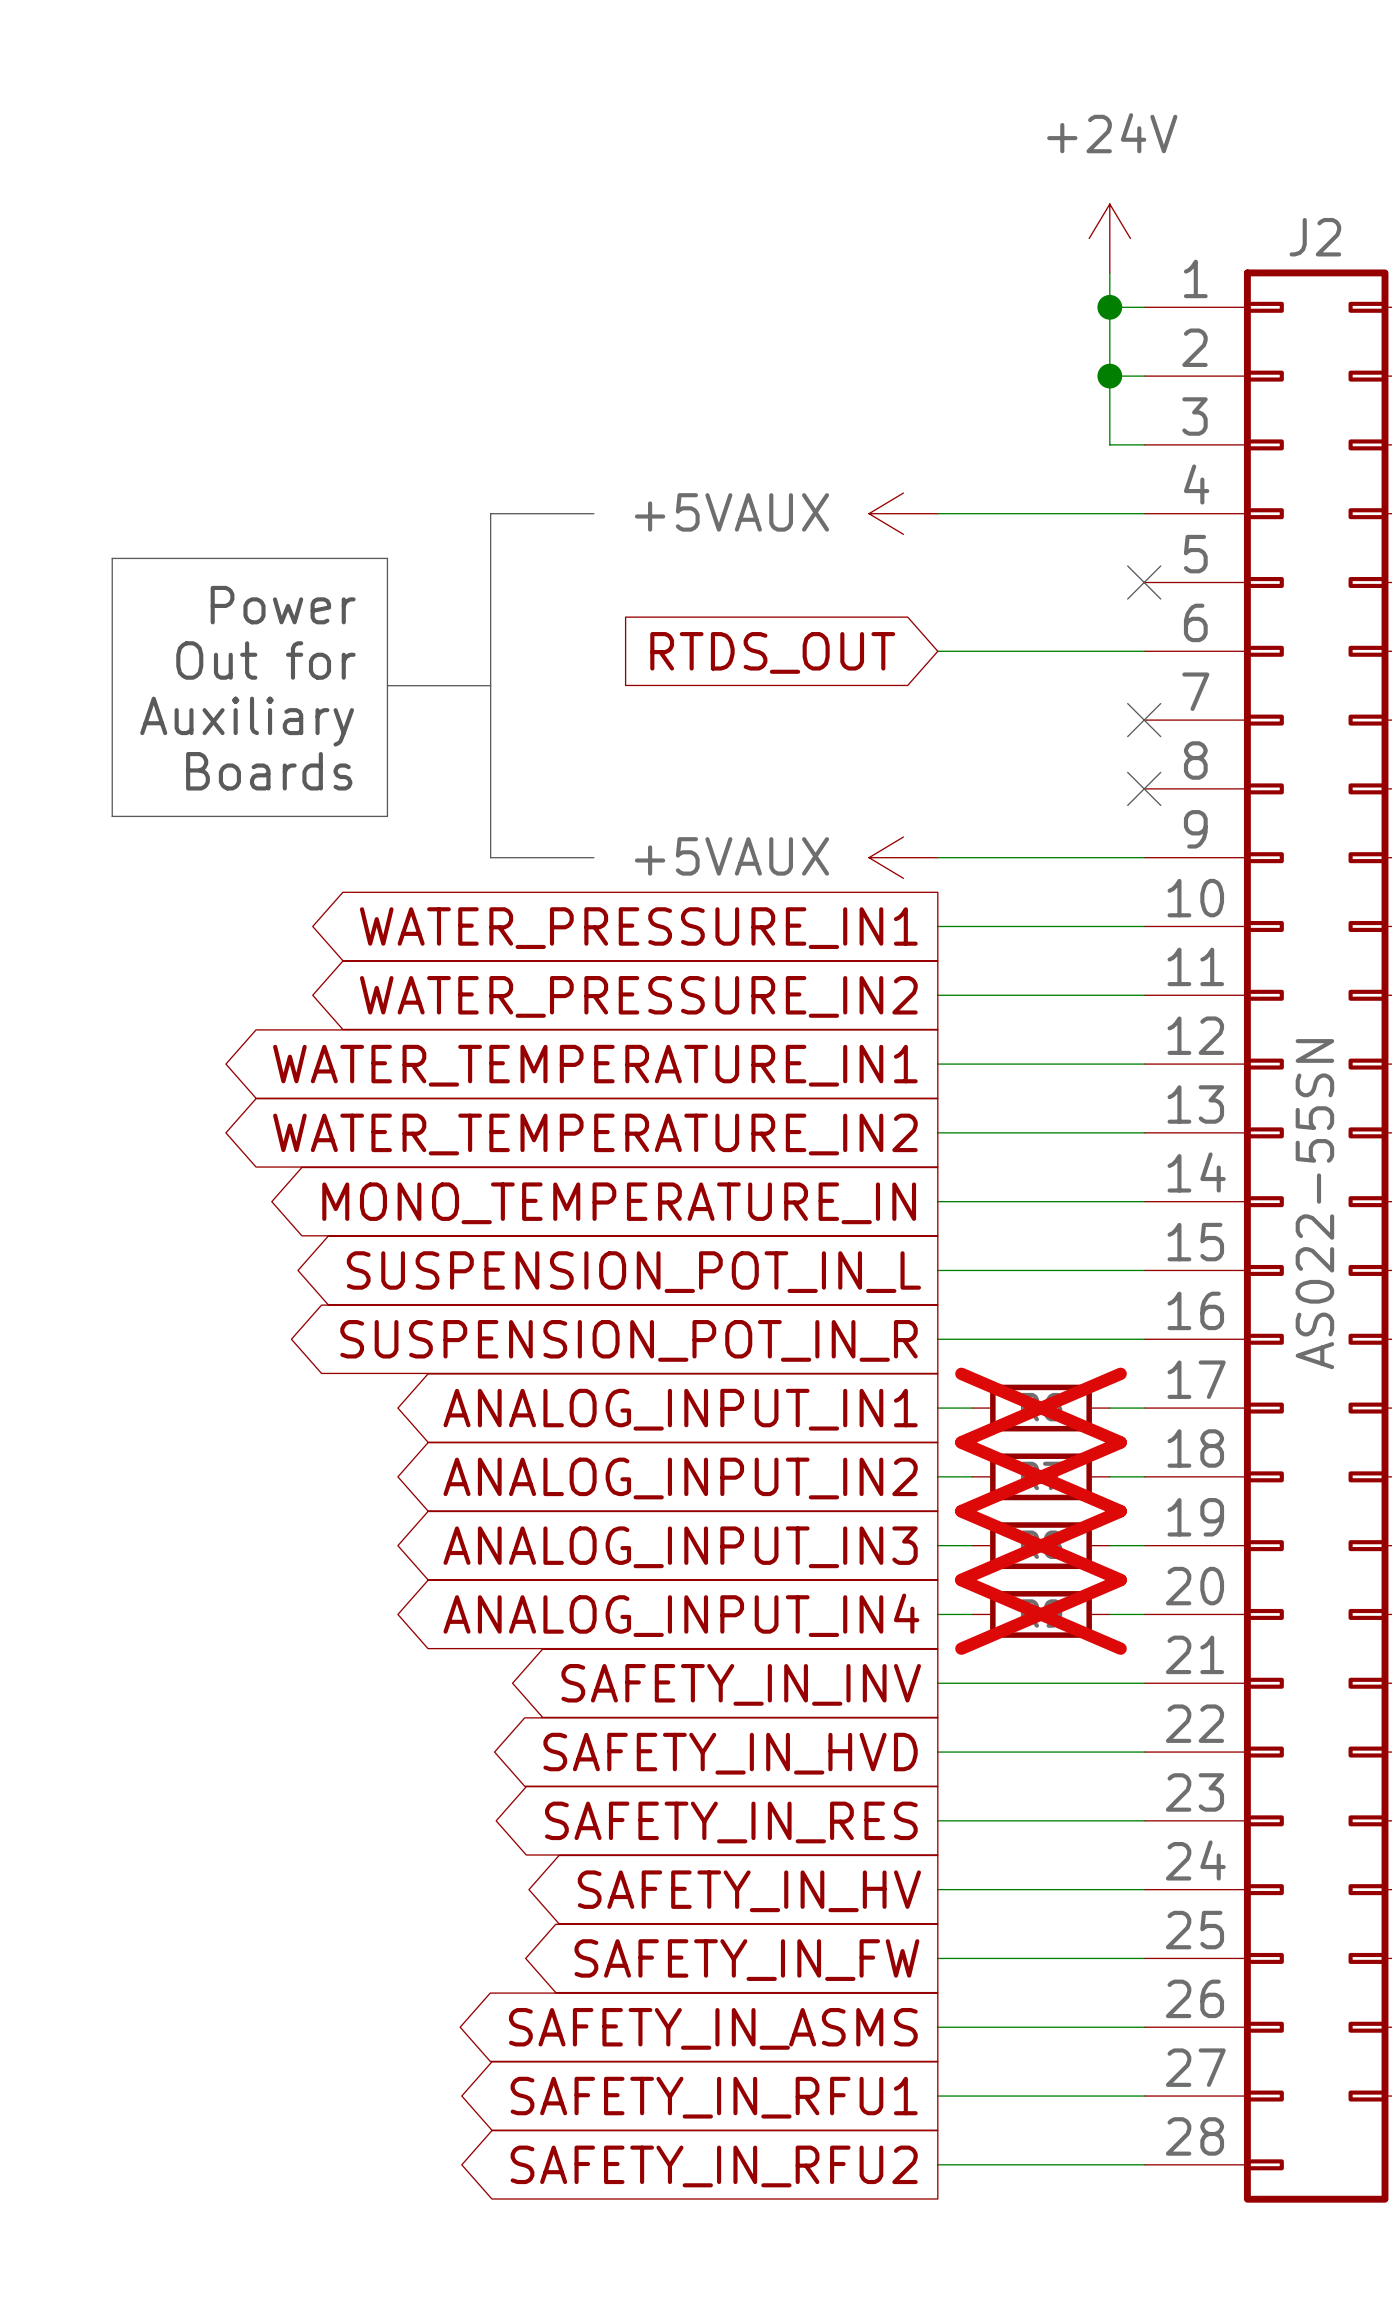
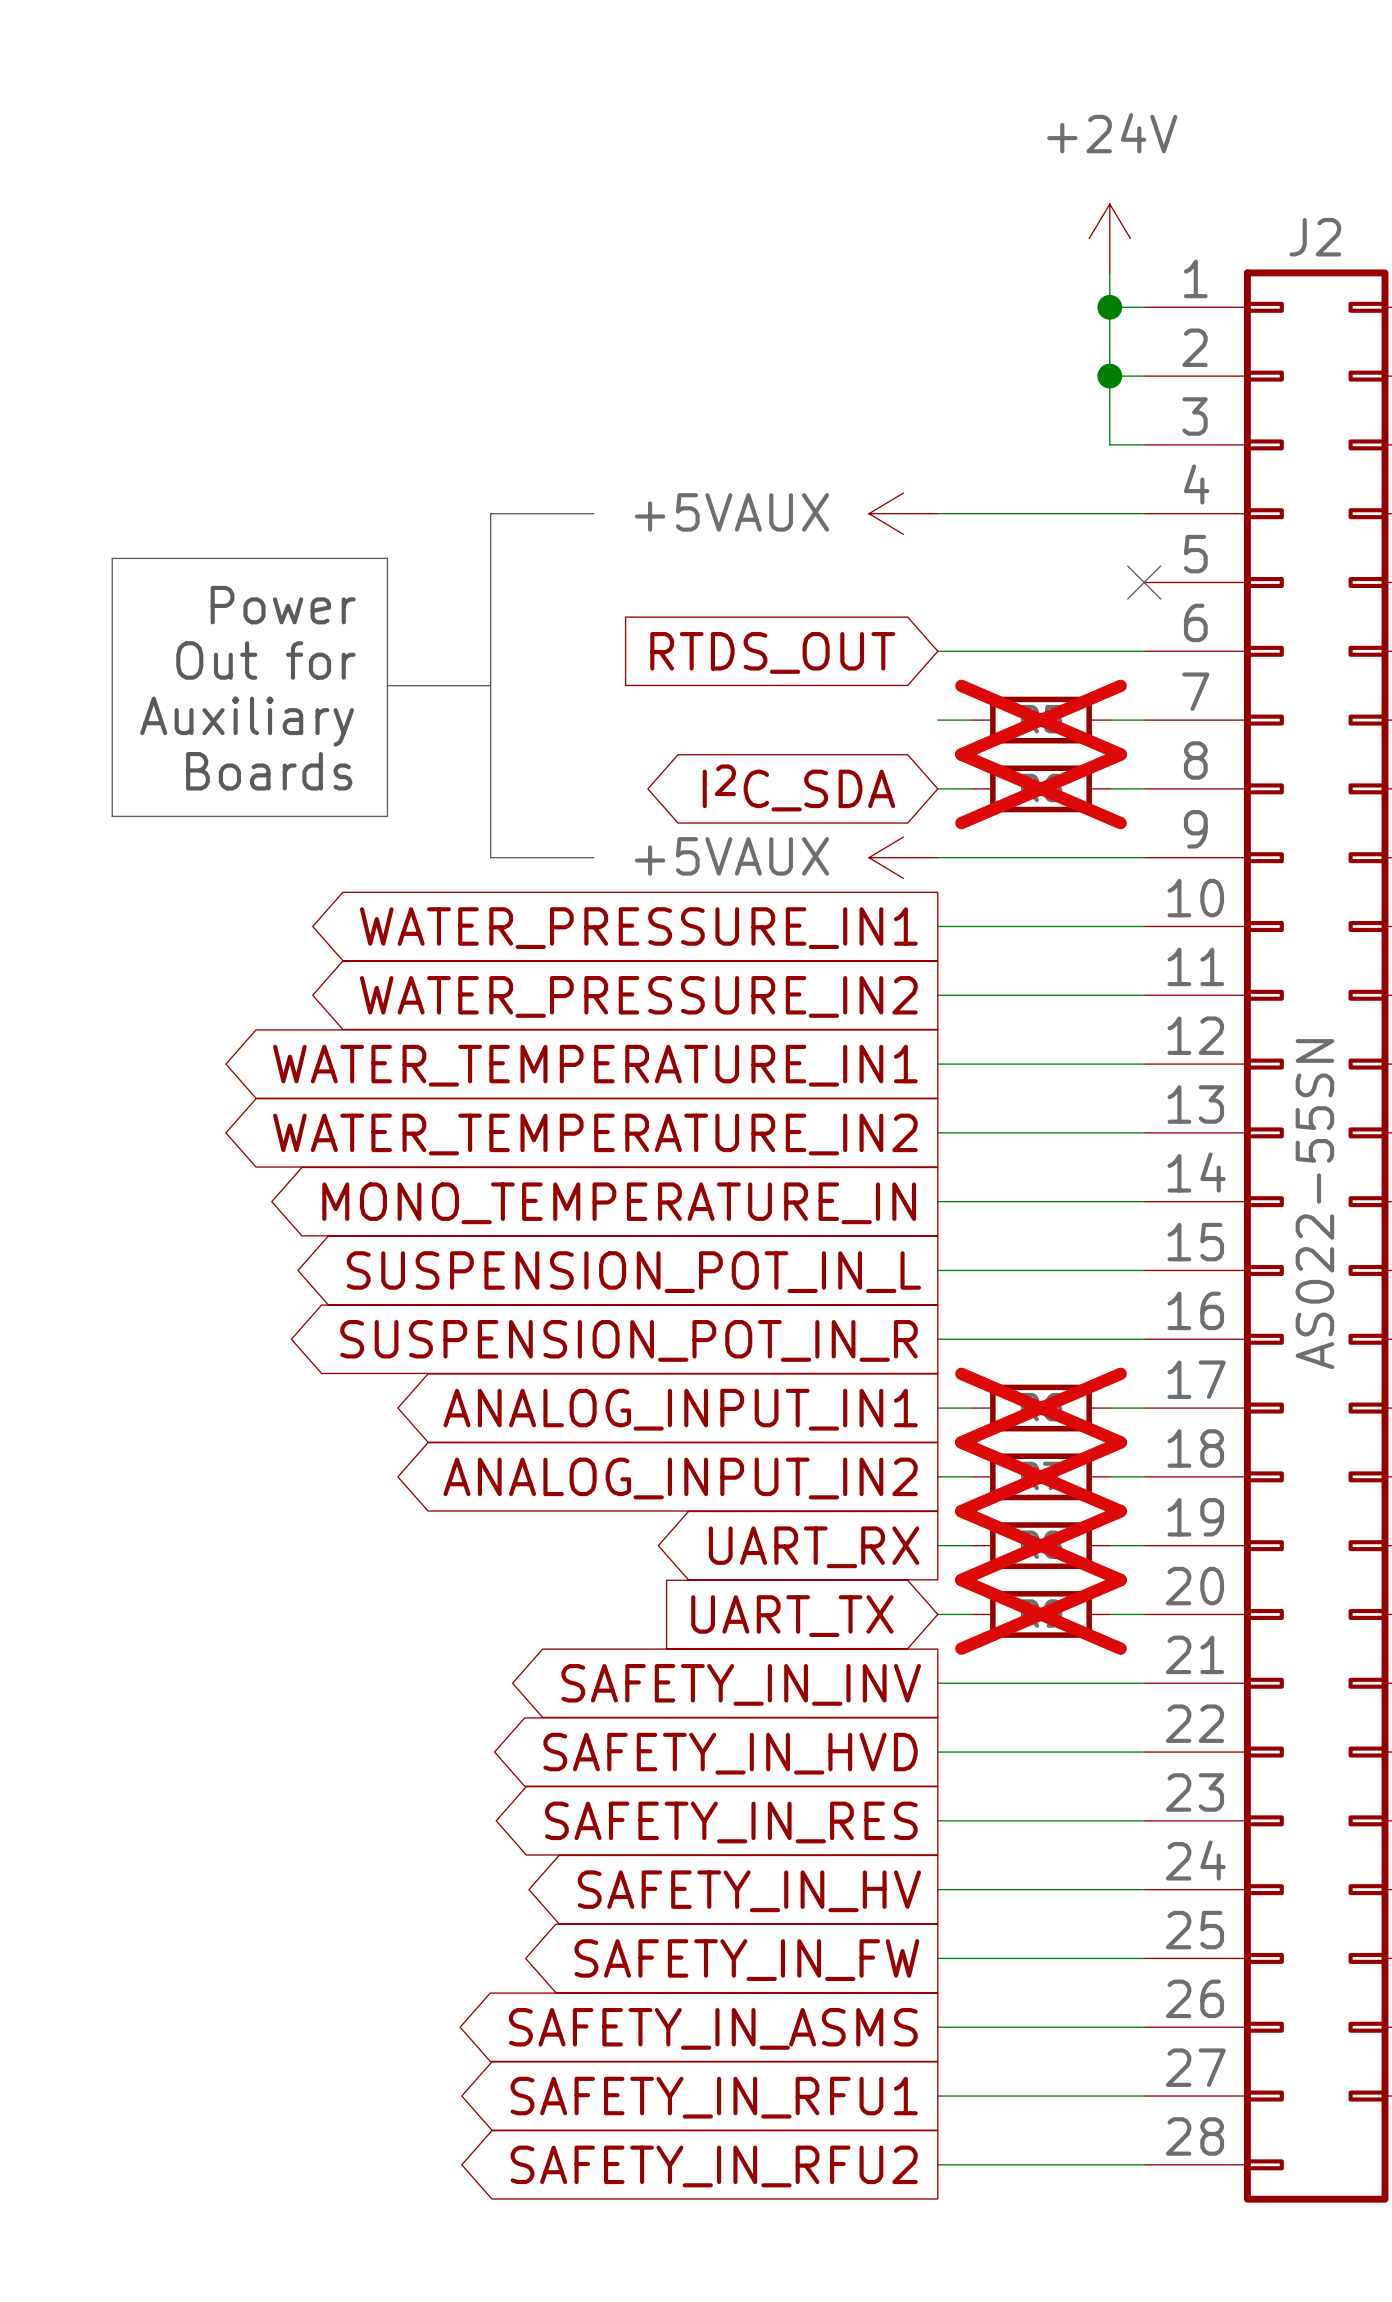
wire: none -> (937, 720) (972, 720)
part: none -> (1041, 720)
wire: none -> (1109, 720) (1144, 720)
no-connect mark: (1144, 720) -> none
global label: none -> I2C_SDA (798, 787)
wire: none -> (937, 788) (972, 788)
part: none -> (1041, 788)
wire: none -> (1109, 788) (1144, 788)
no-connect mark: (1144, 788) -> none
global label: ANALOG_INPUT_IN3 (680, 1547) -> UART_RX (814, 1547)
global label shape: output (681, 1615) -> input (792, 1616)
global label: ANALOG_INPUT_IN4 (681, 1615) -> UART_TX (792, 1616)

